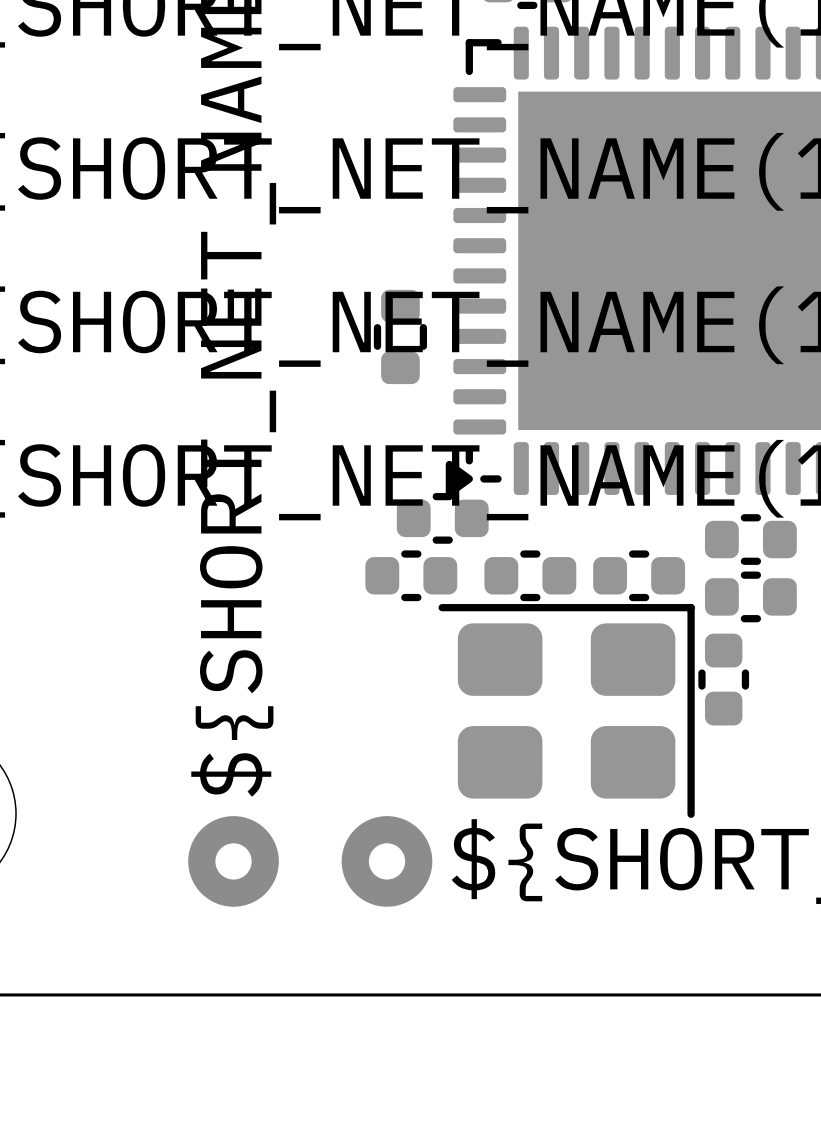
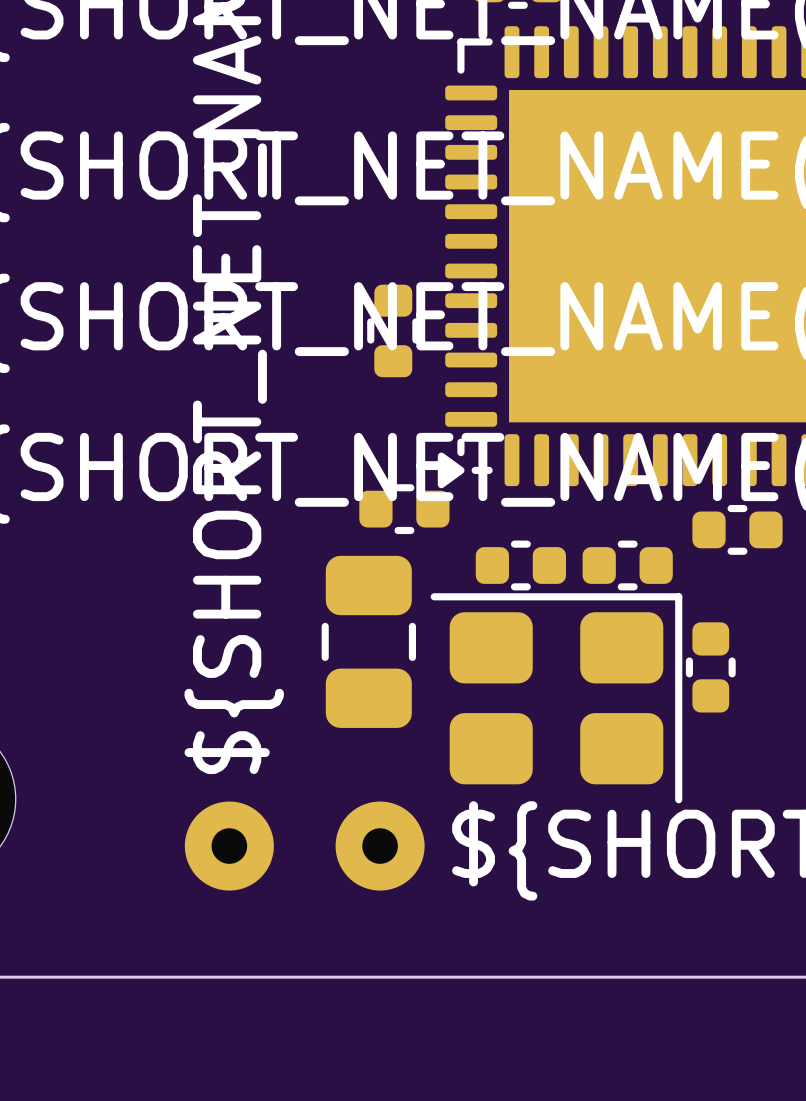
part: none -> (404, 509)
part: (442, 518) -> none
part: (411, 575) -> none
part: (750, 596) -> none
part: none -> (368, 641)

